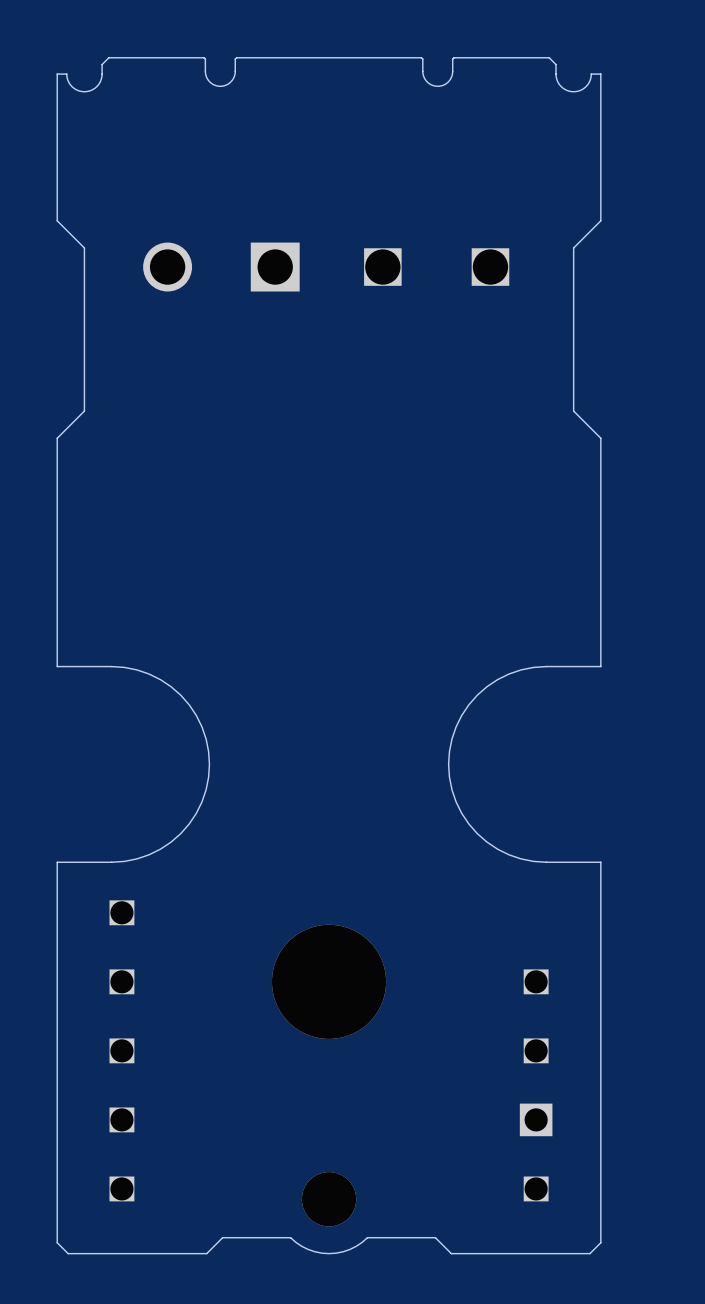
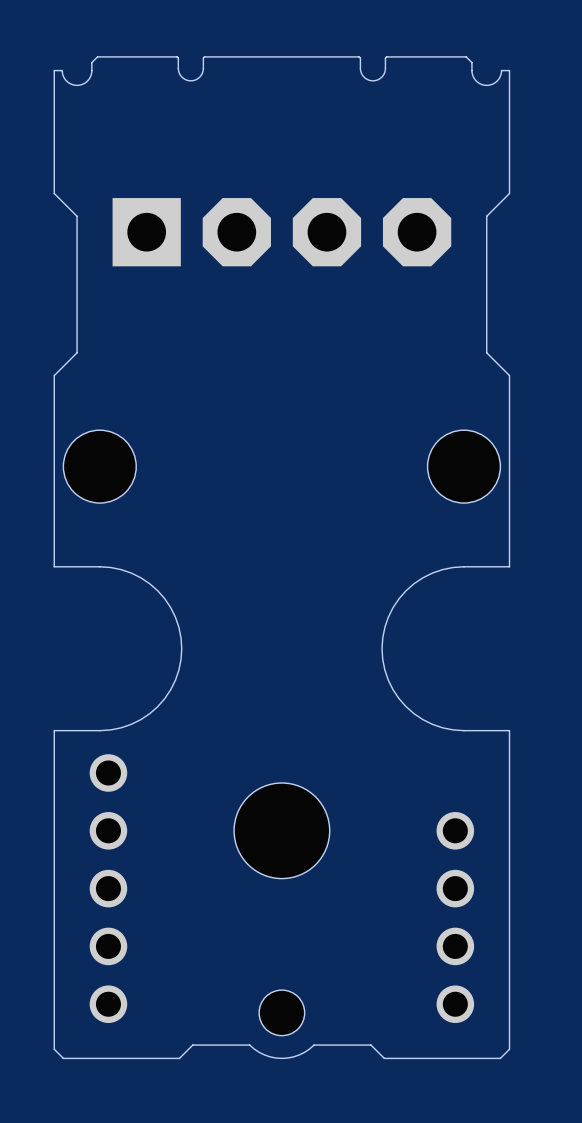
part: (167, 267) -> none
part: (275, 267) -> none
part: none -> (281, 232)
part: (382, 267) -> none
part: (490, 267) -> none
hole: none -> (99, 466)
hole: none -> (463, 466)
part: (121, 912) -> none
part: (121, 981) -> none
part: (329, 981) -> none
hole: none -> (281, 830)
part: (536, 981) -> none
part footprint: [109, 1038, 135, 1064] -> [89, 754, 128, 1024]
part: (536, 1050) -> none
part: none -> (455, 917)
part: (121, 1119) -> none
part: (536, 1119) -> none
part: (121, 1188) -> none
part: (536, 1188) -> none
part: (329, 1199) -> none
hole: none -> (281, 1012)

